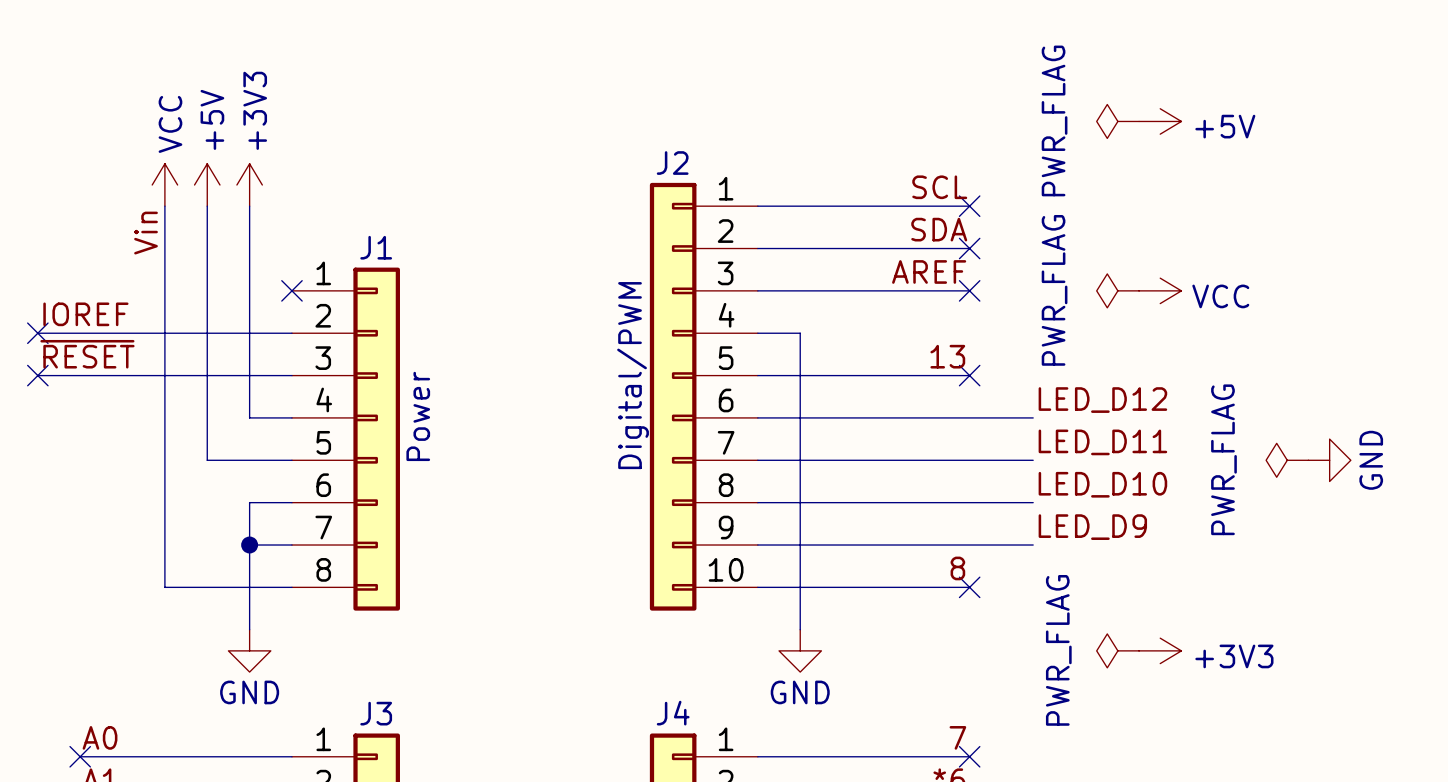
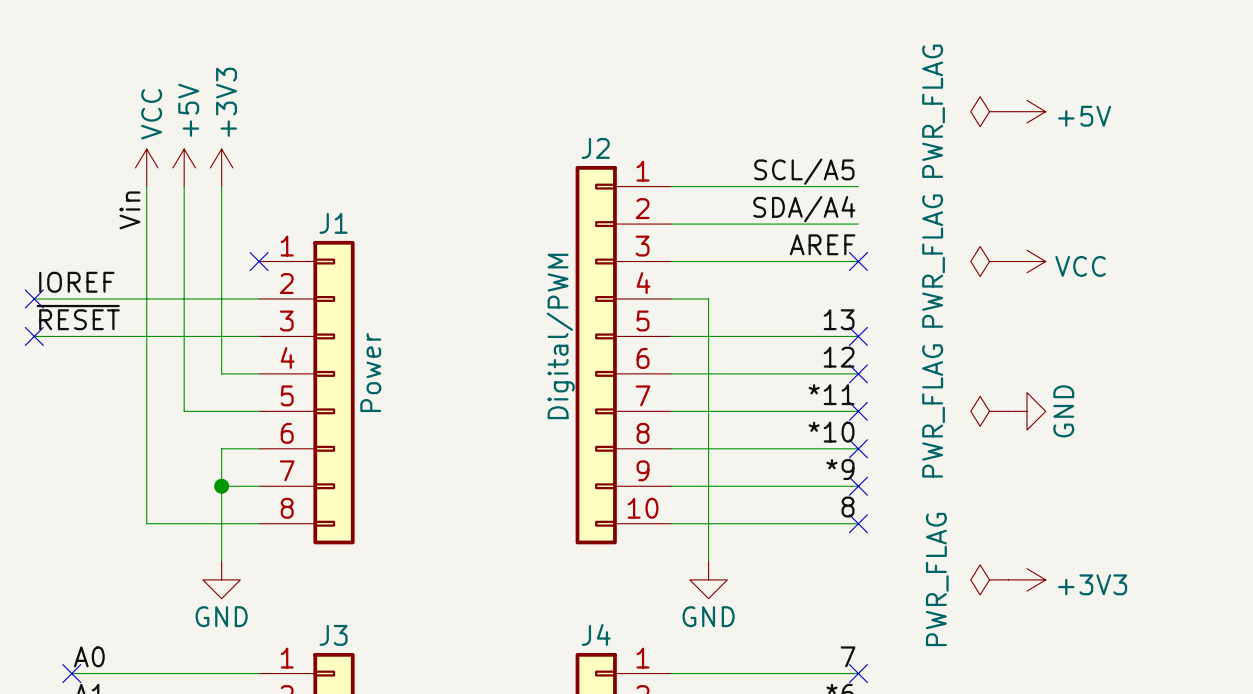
label: SCL (939, 187) -> SCL/A5 (804, 171)
no-connect mark: (969, 206) -> none
label: SDA (939, 229) -> SDA/A4 (804, 209)
no-connect mark: (969, 248) -> none
label: none -> 12 (839, 357)
label: LED_D12 (1102, 400) -> none
wire: (969, 417) (1033, 417) -> none
no-connect mark: none -> (858, 373)
label: none -> *11 (831, 394)
label: LED_D11 (1102, 442) -> none
wire: (969, 460) (1033, 460) -> none
no-connect mark: none -> (858, 411)
power symbol position: PWR_FLAG (1287, 460) -> PWR_FLAG (989, 411)
power symbol position: GND (1329, 460) -> GND (1026, 411)
label: none -> *10 (831, 432)
label: LED_D10 (1102, 484) -> none
wire: (969, 502) (1033, 502) -> none
no-connect mark: none -> (858, 448)
label: none -> *9 (840, 469)
label: LED_D9 (1092, 527) -> none
wire: (969, 545) (1033, 545) -> none
no-connect mark: none -> (858, 486)

